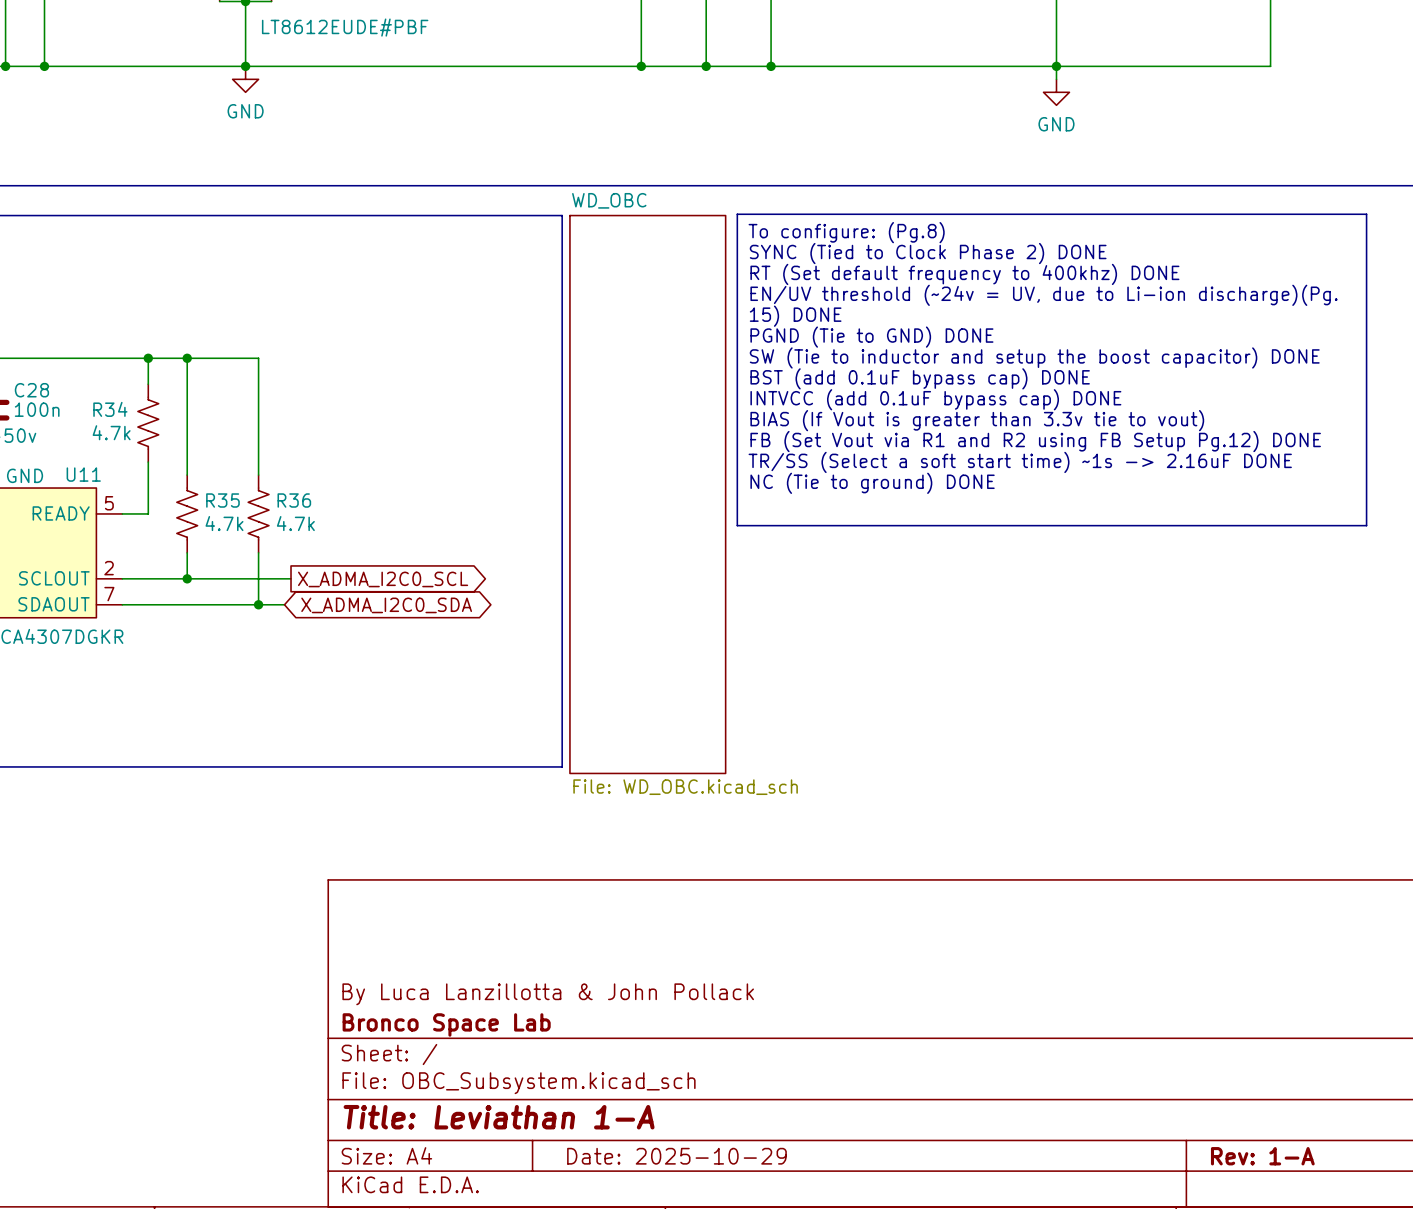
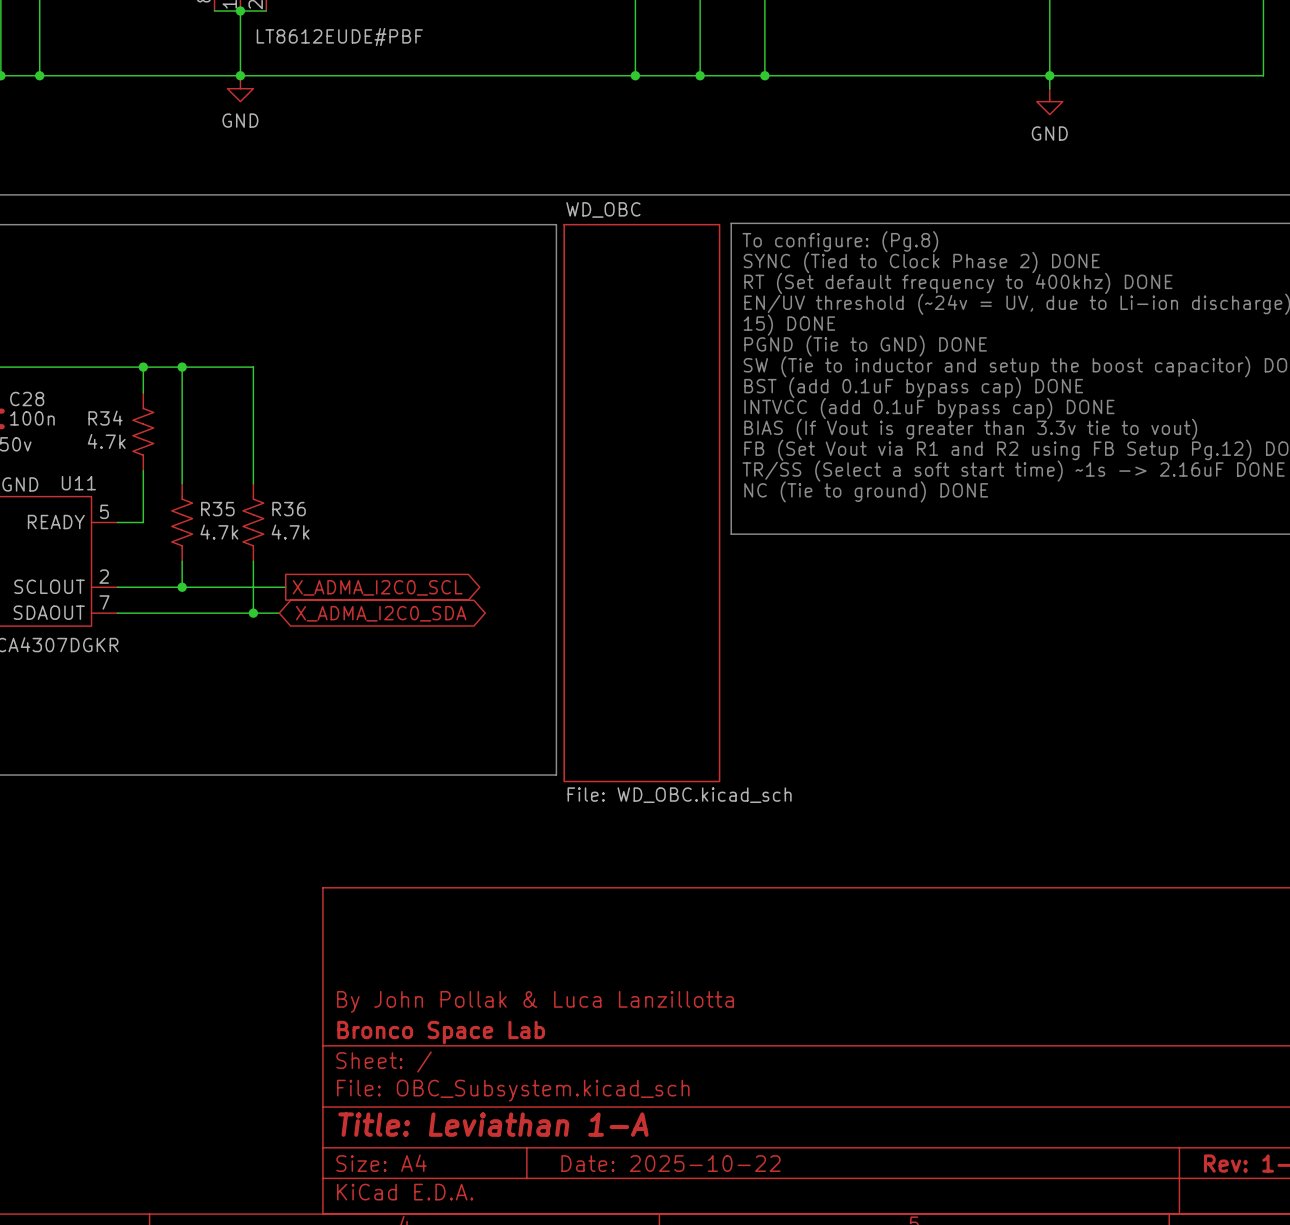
title block: By Luca Lanzillotta & John Pollack (548, 994) -> By John Pollak & Luca Lanzillotta (535, 1001)
title block: Date: 2025-10-29 (676, 1156) -> Date: 2025-10-22 (670, 1163)

